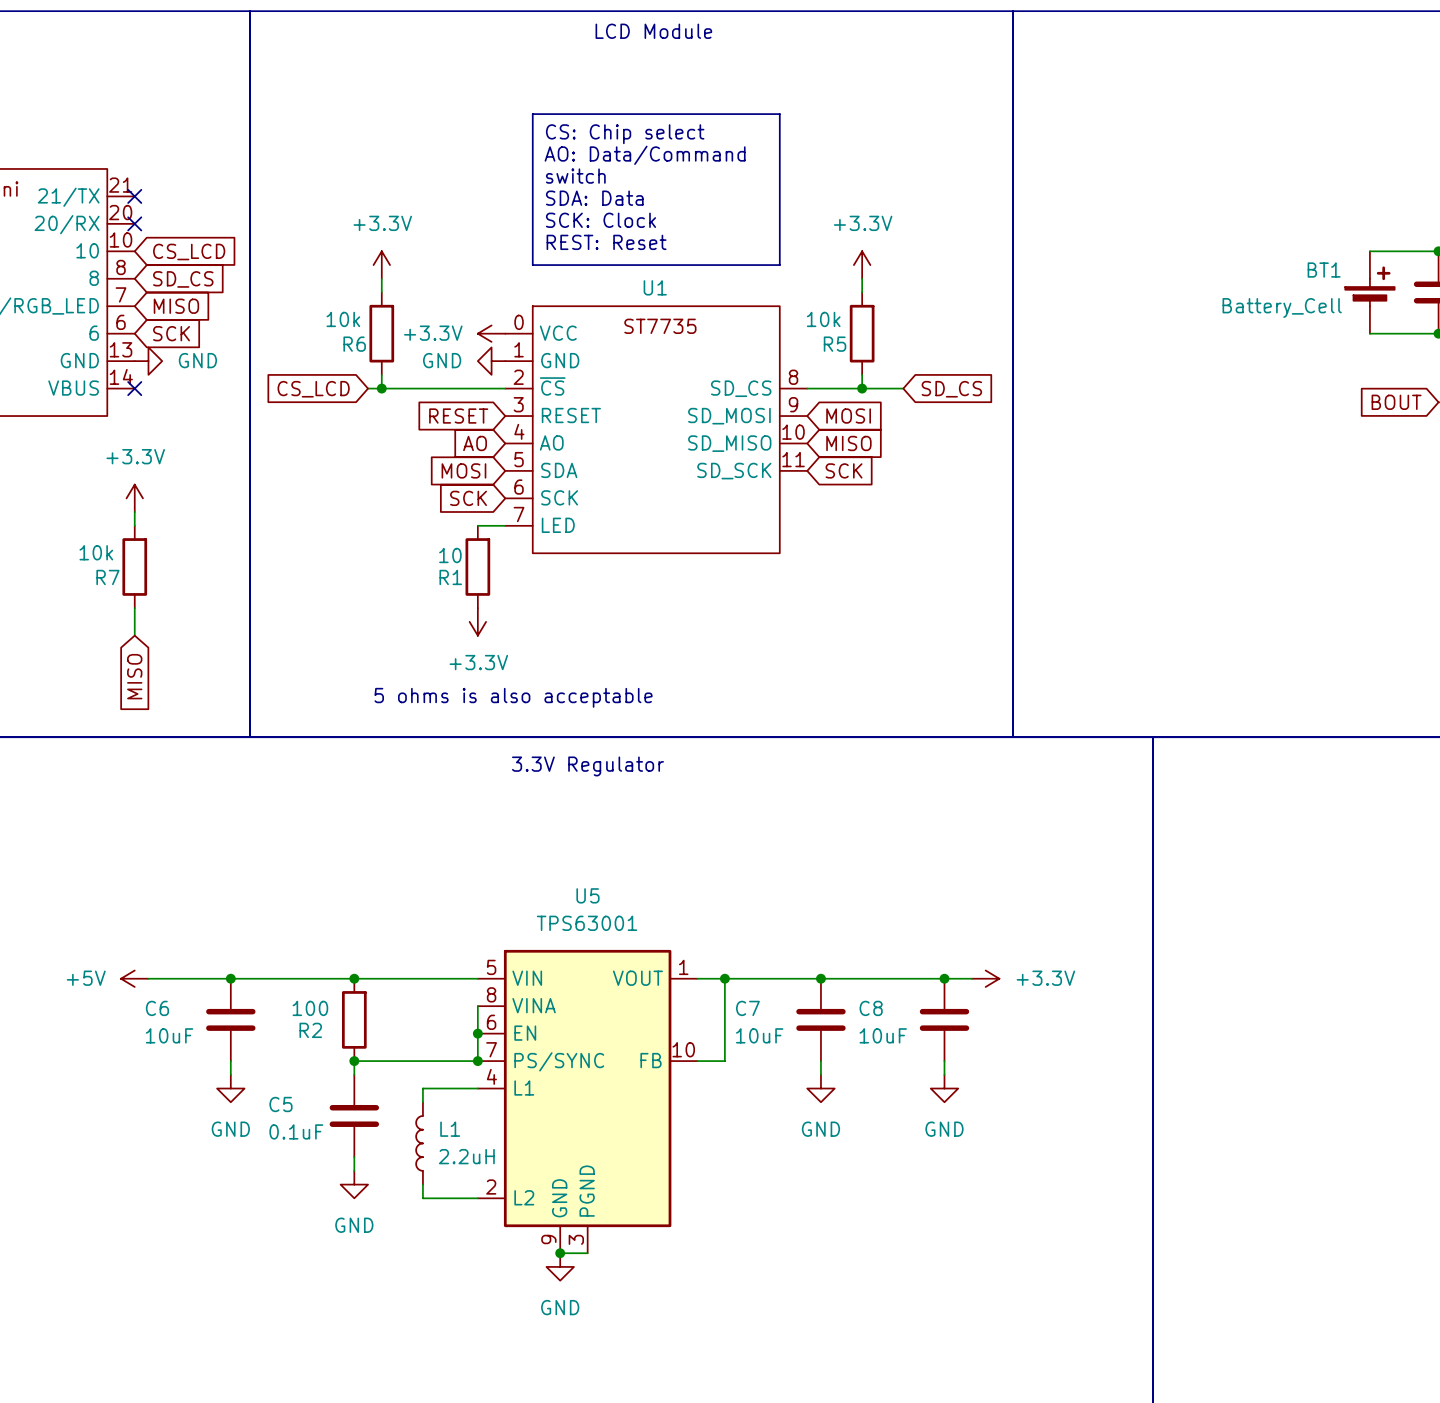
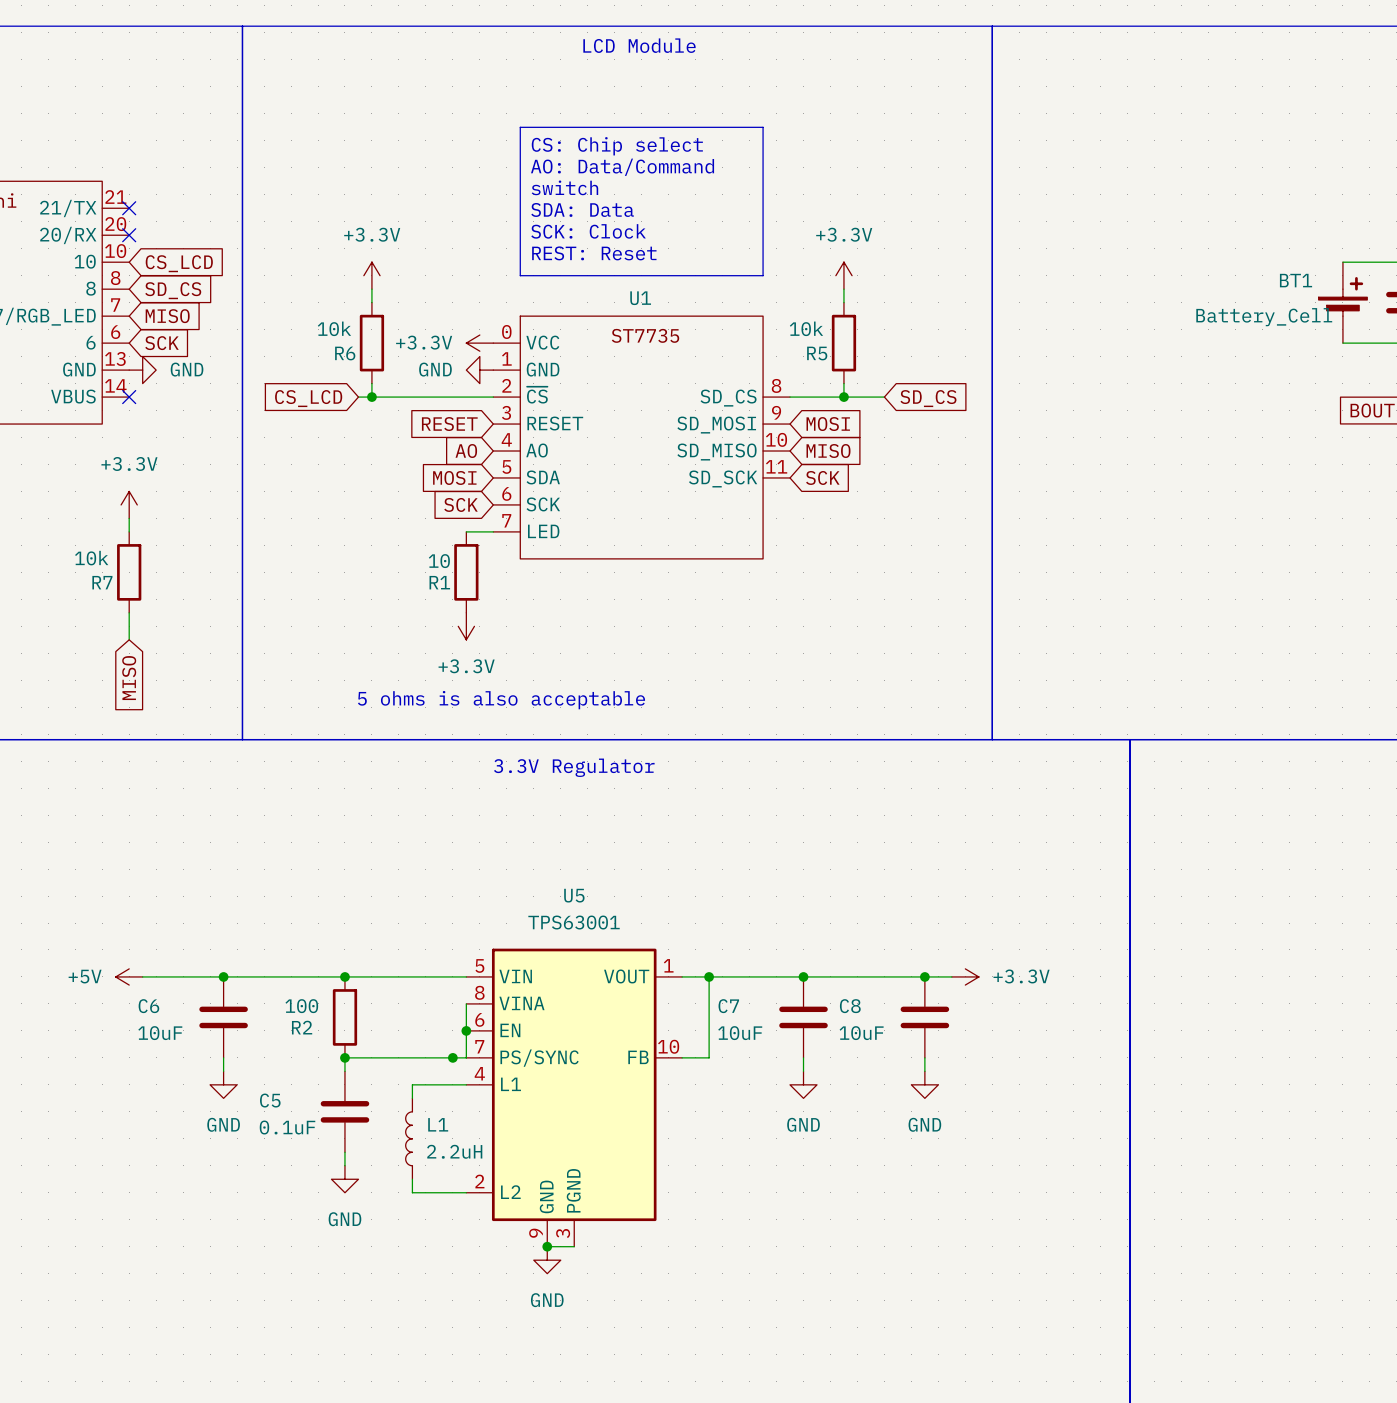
junction position: (477, 1061) -> (452, 1057)

